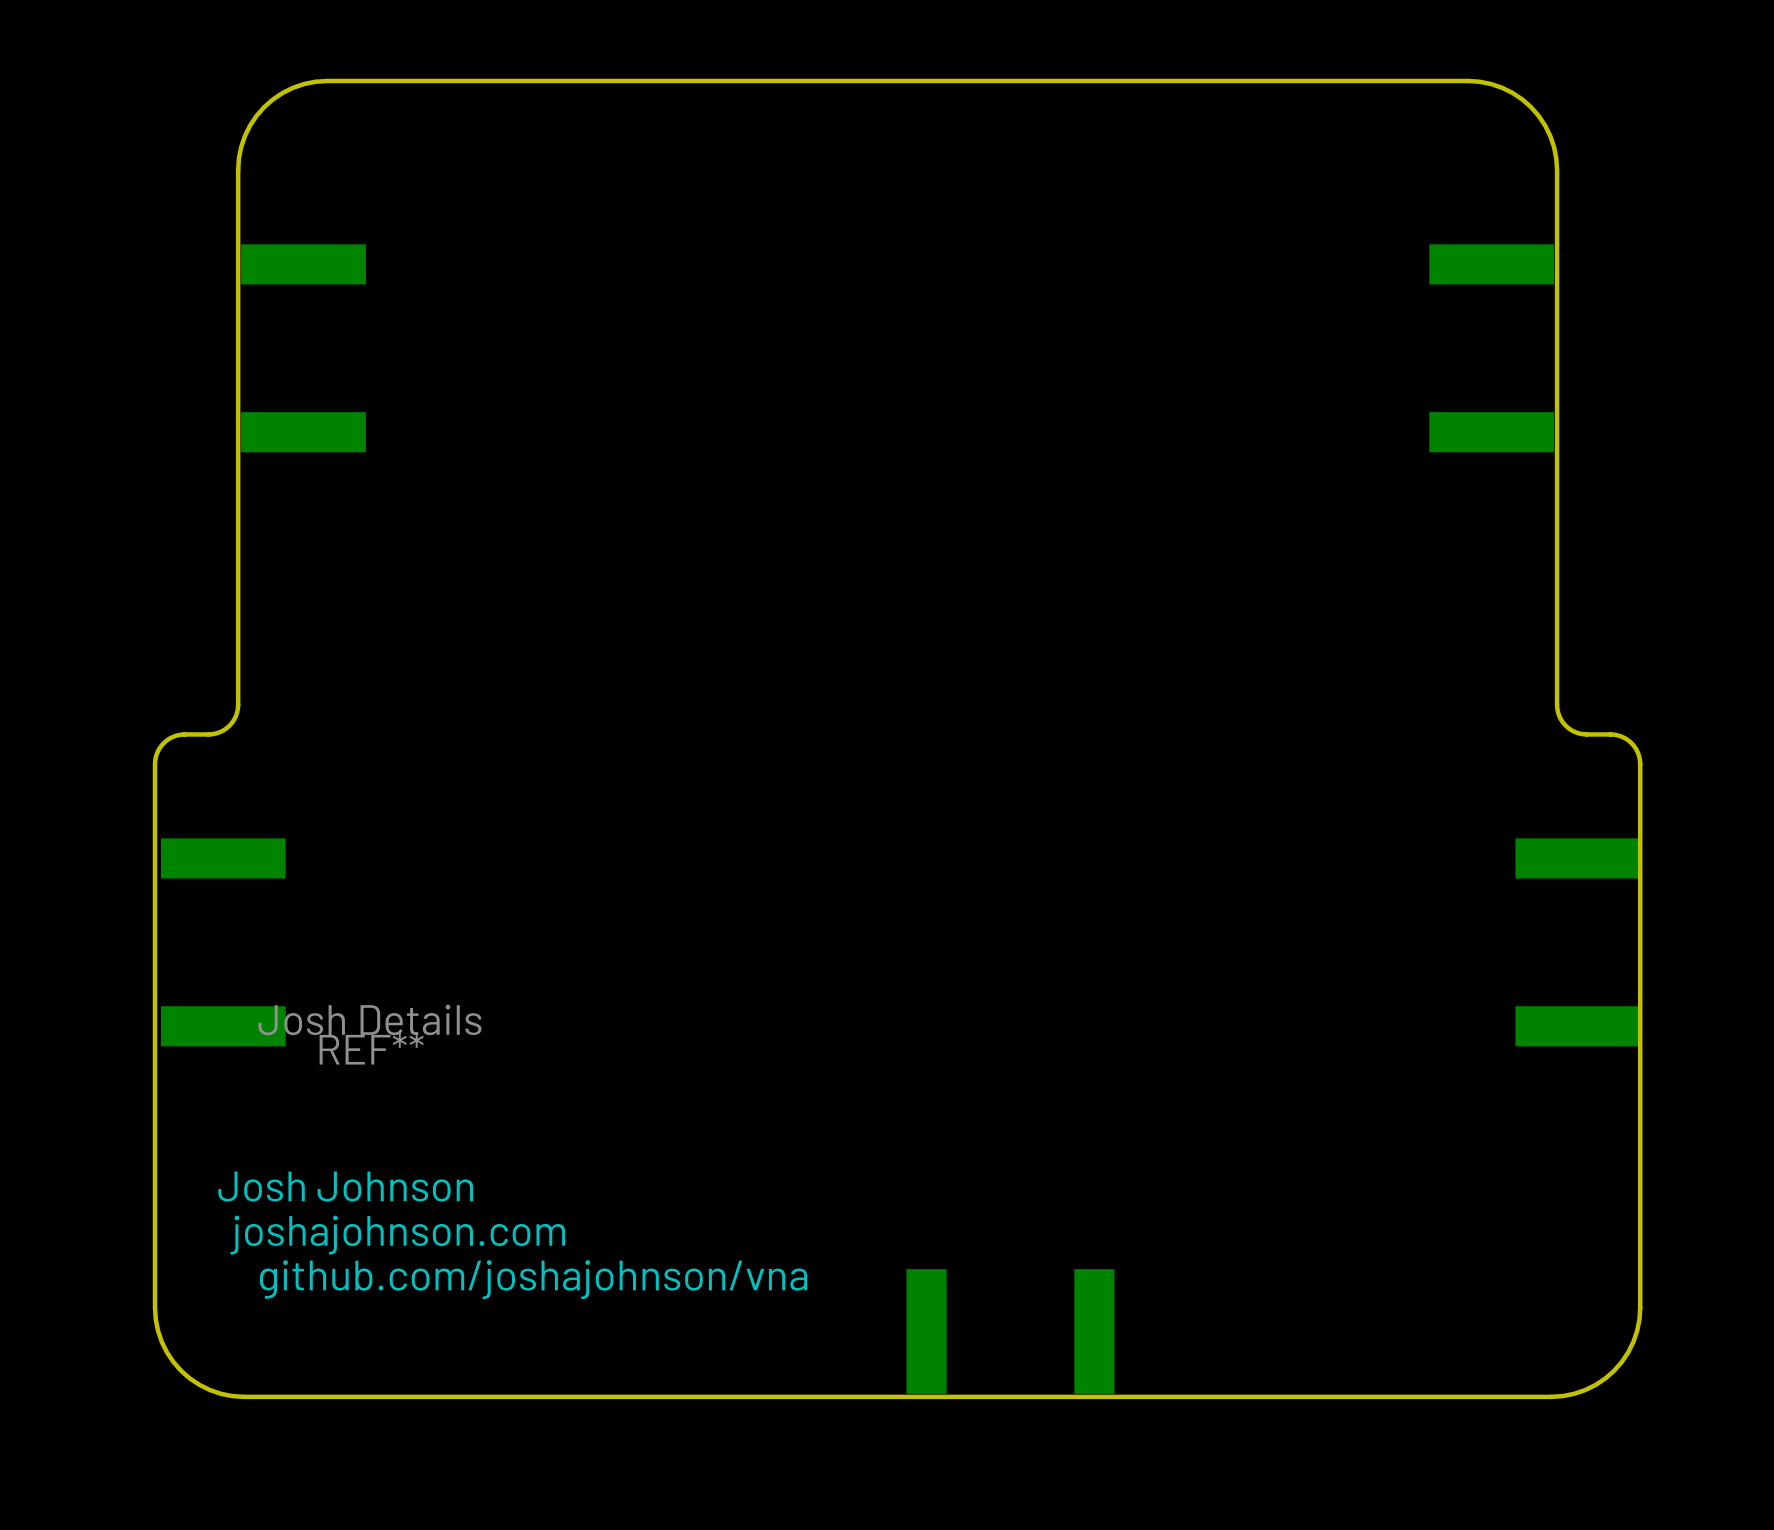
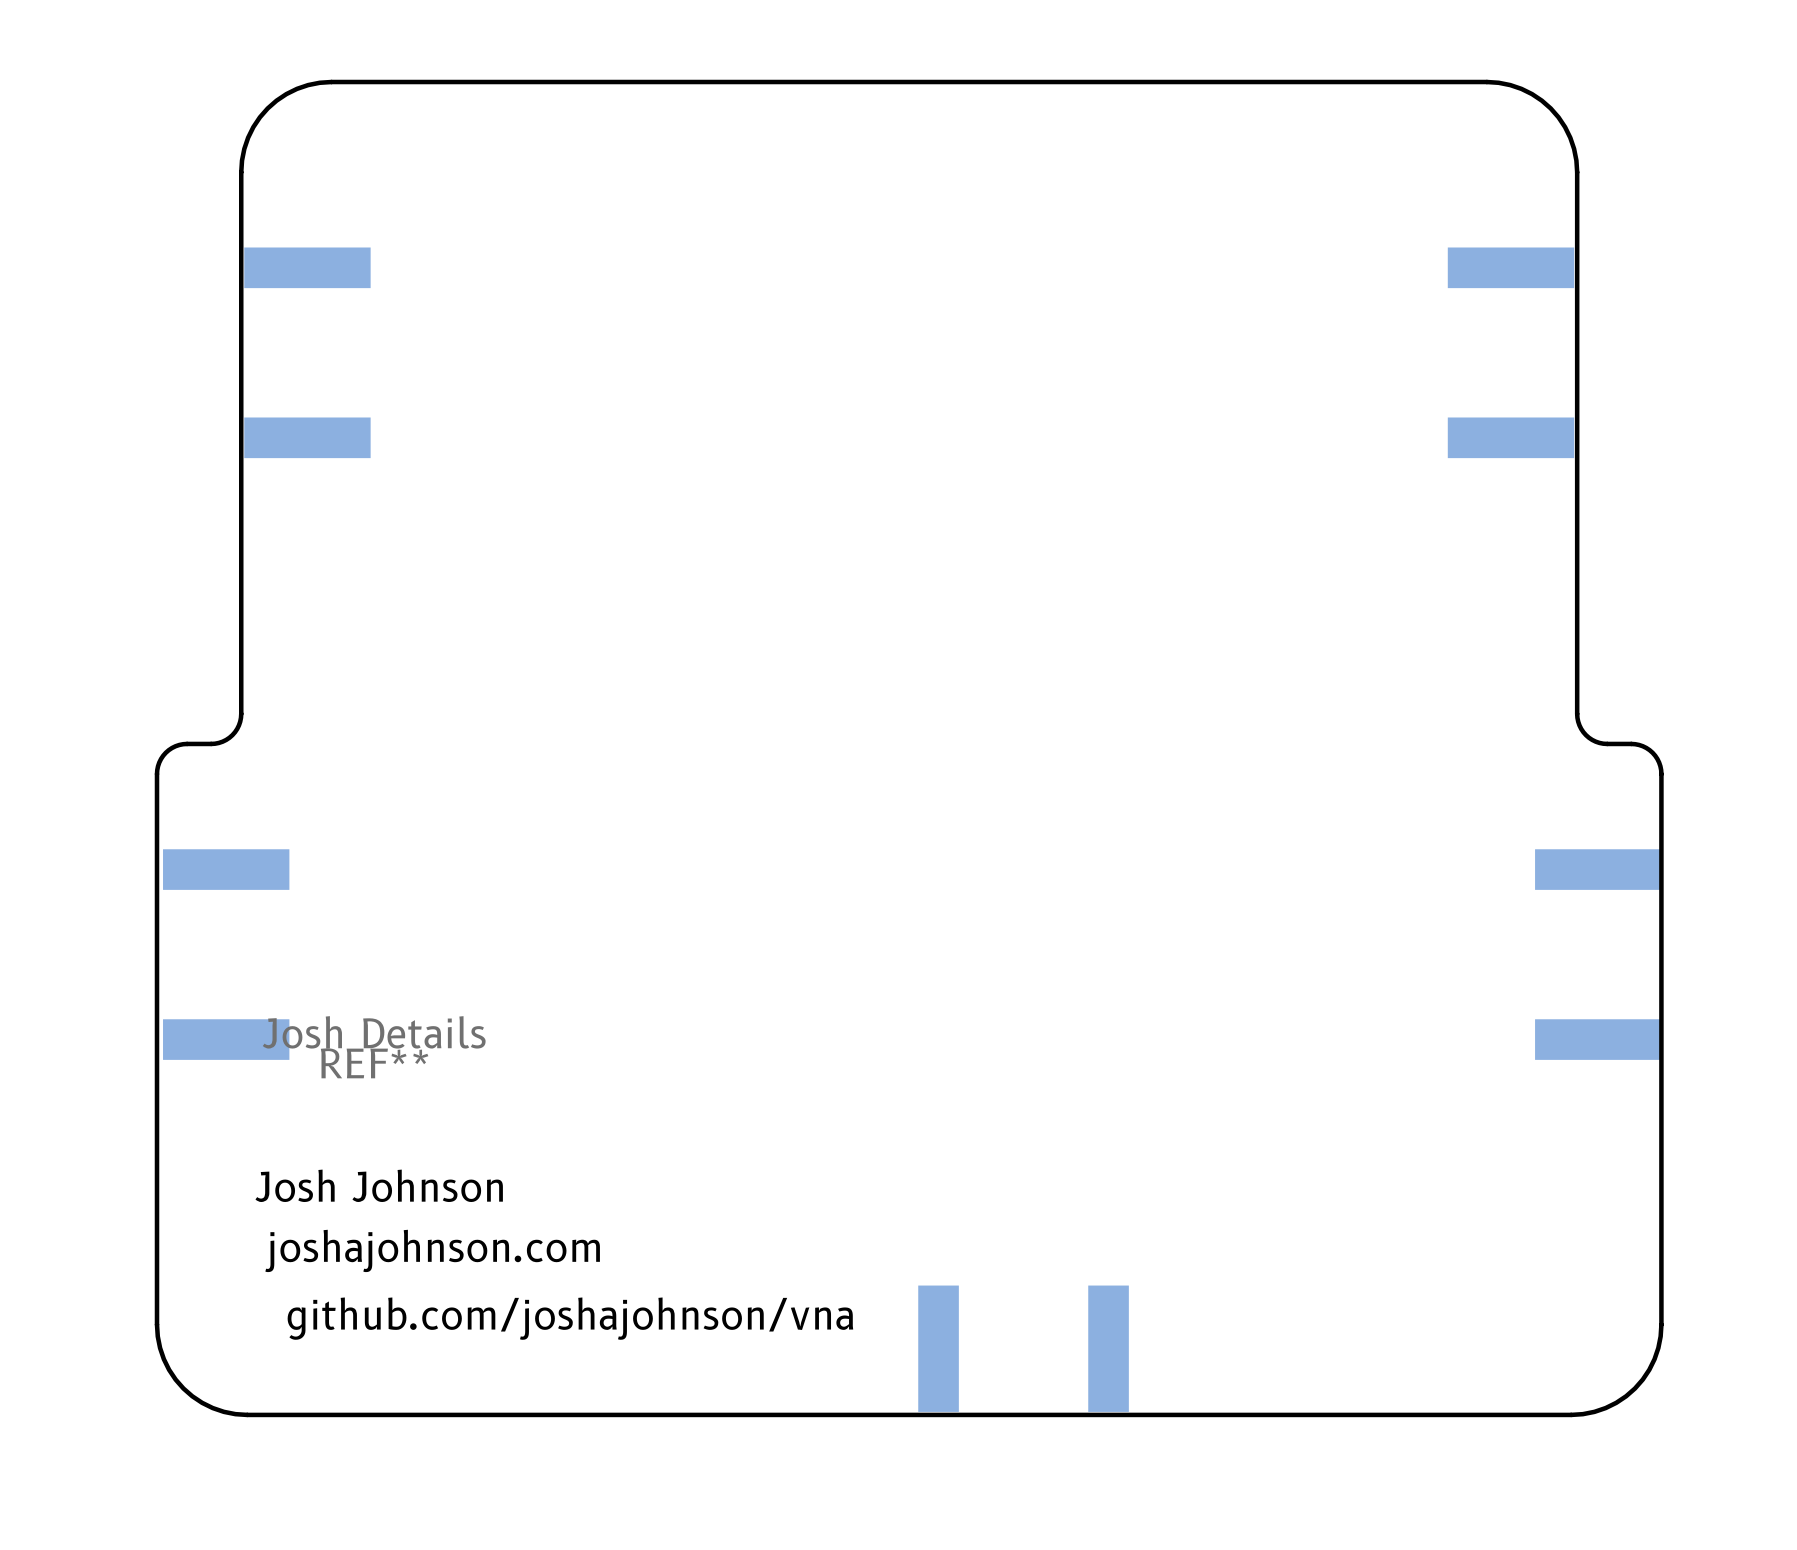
REF**: Josh Details (512, 1151) -> none
REF**: none -> Josh Details (554, 1177)

